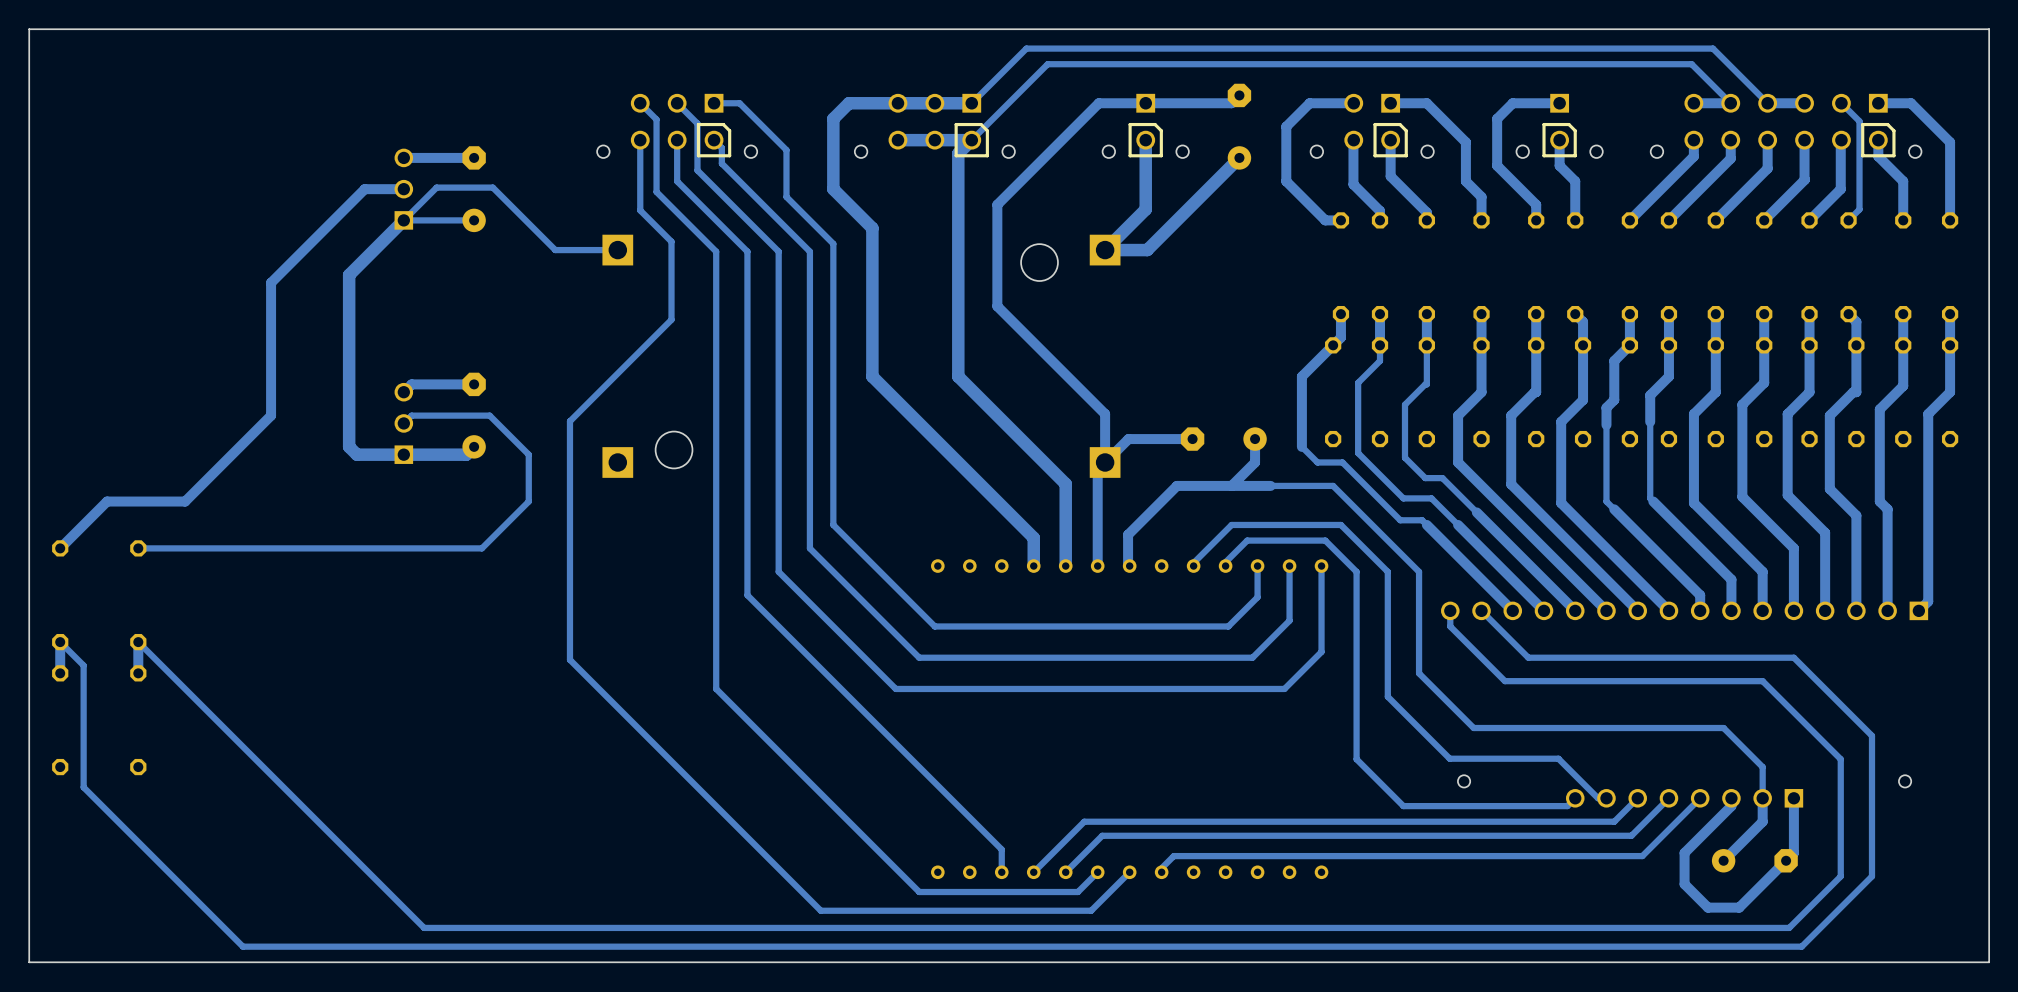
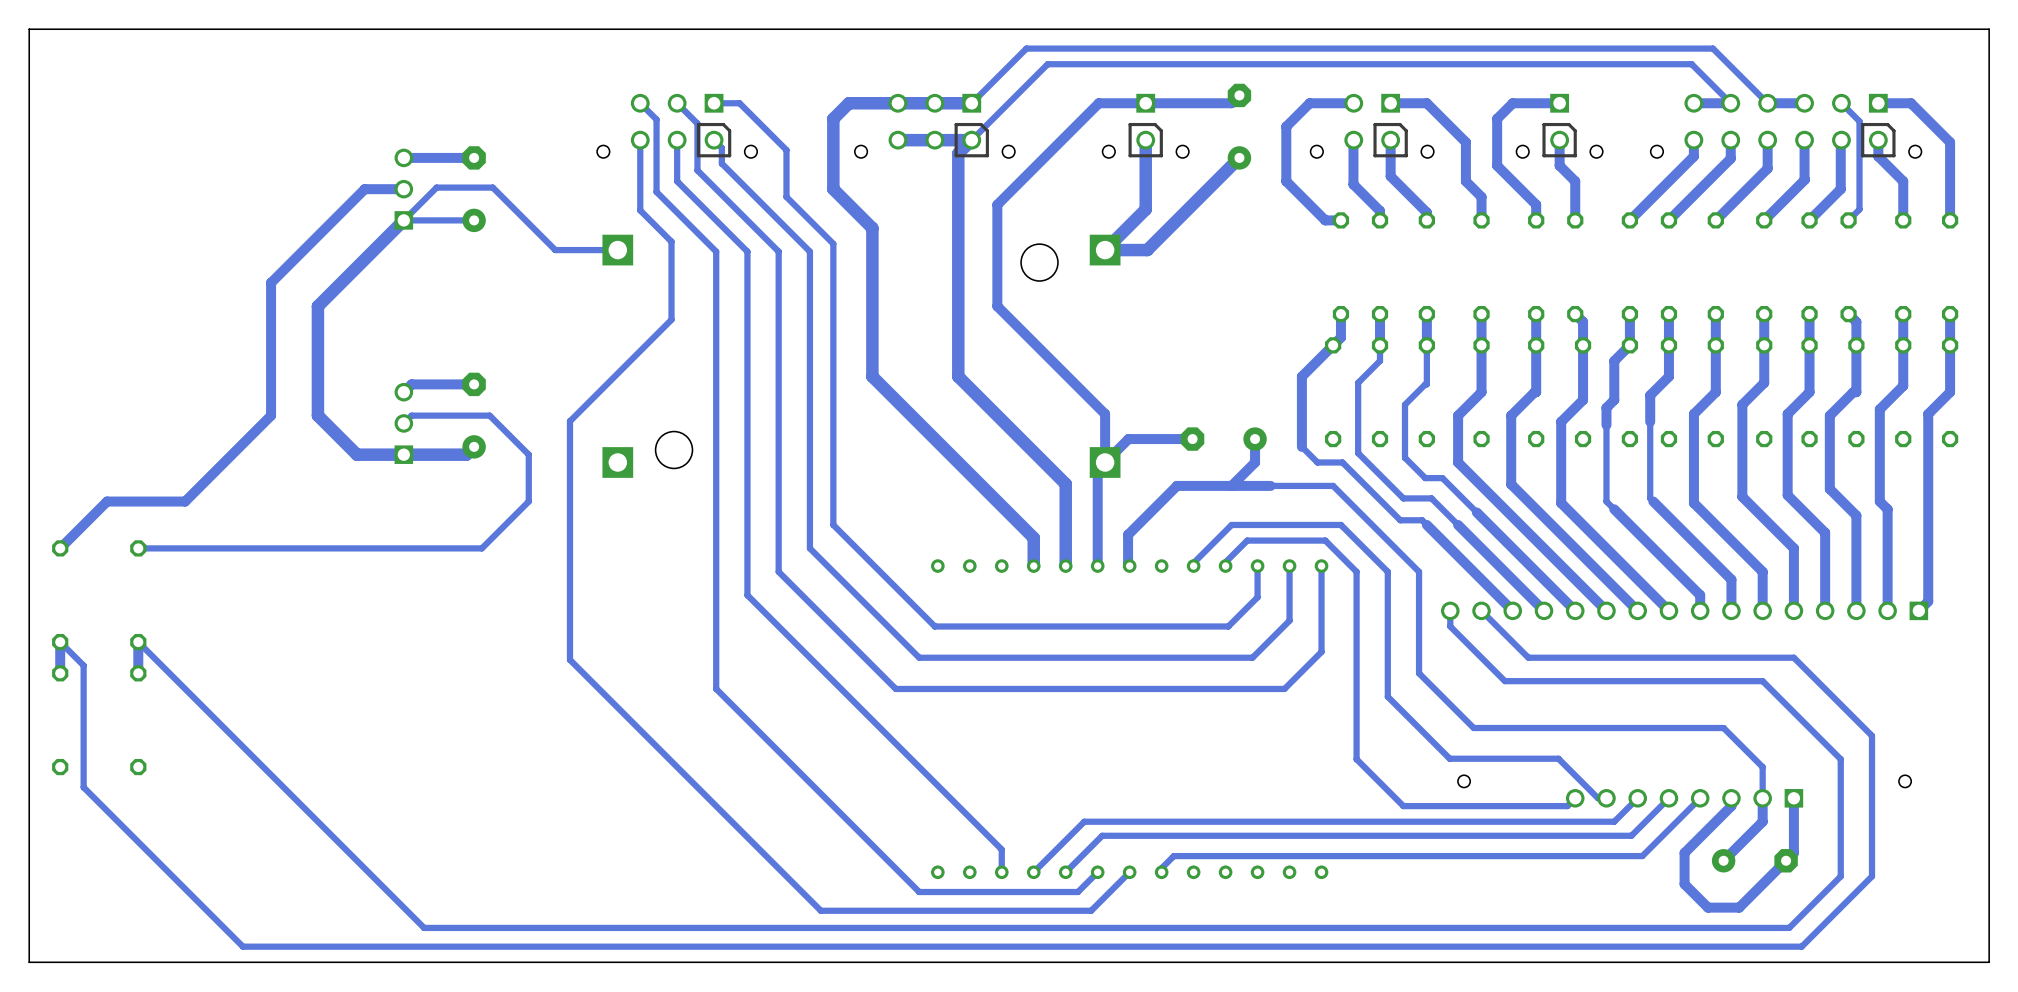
bottom track: (349, 275) (349, 446) -> (349, 275) (317, 306) (317, 415) (349, 446)

